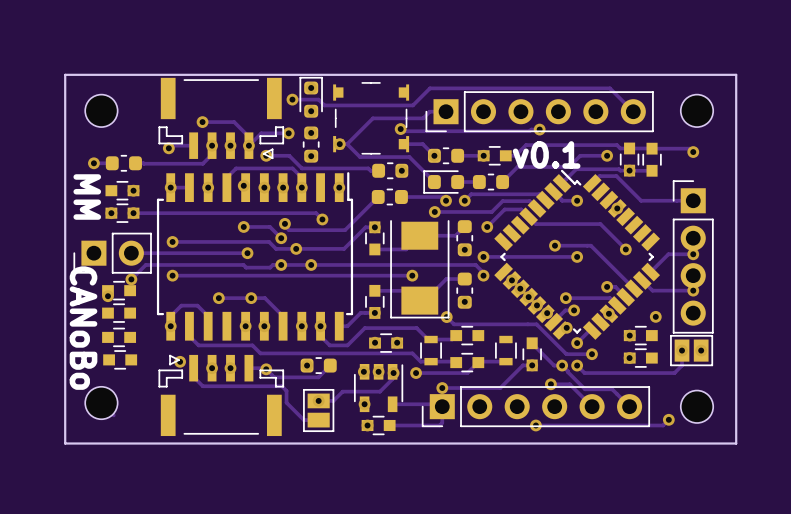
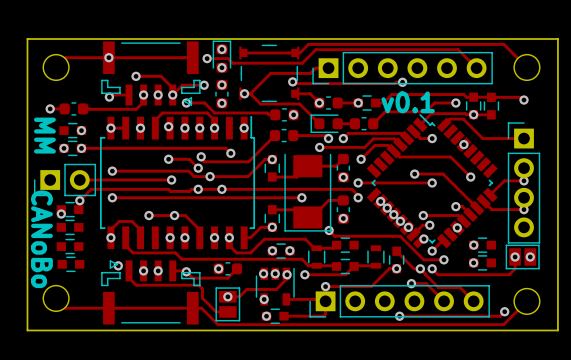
track: none -> (244, 52) (299, 52) (308, 44) (503, 44) (526, 67)
via: none -> (108, 57)
track: none -> (192, 57) (65, 57) (56, 67)
via: (655, 316) -> none
track: none -> (526, 301) (503, 324) (218, 324) (201, 308) (65, 308)

